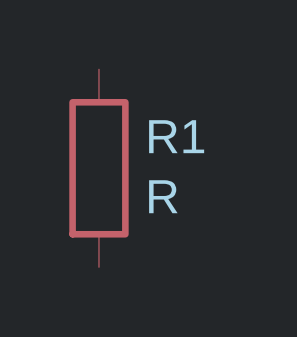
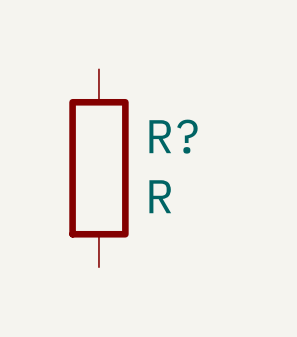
R1 name: R1 (176, 136) -> R? (173, 136)

